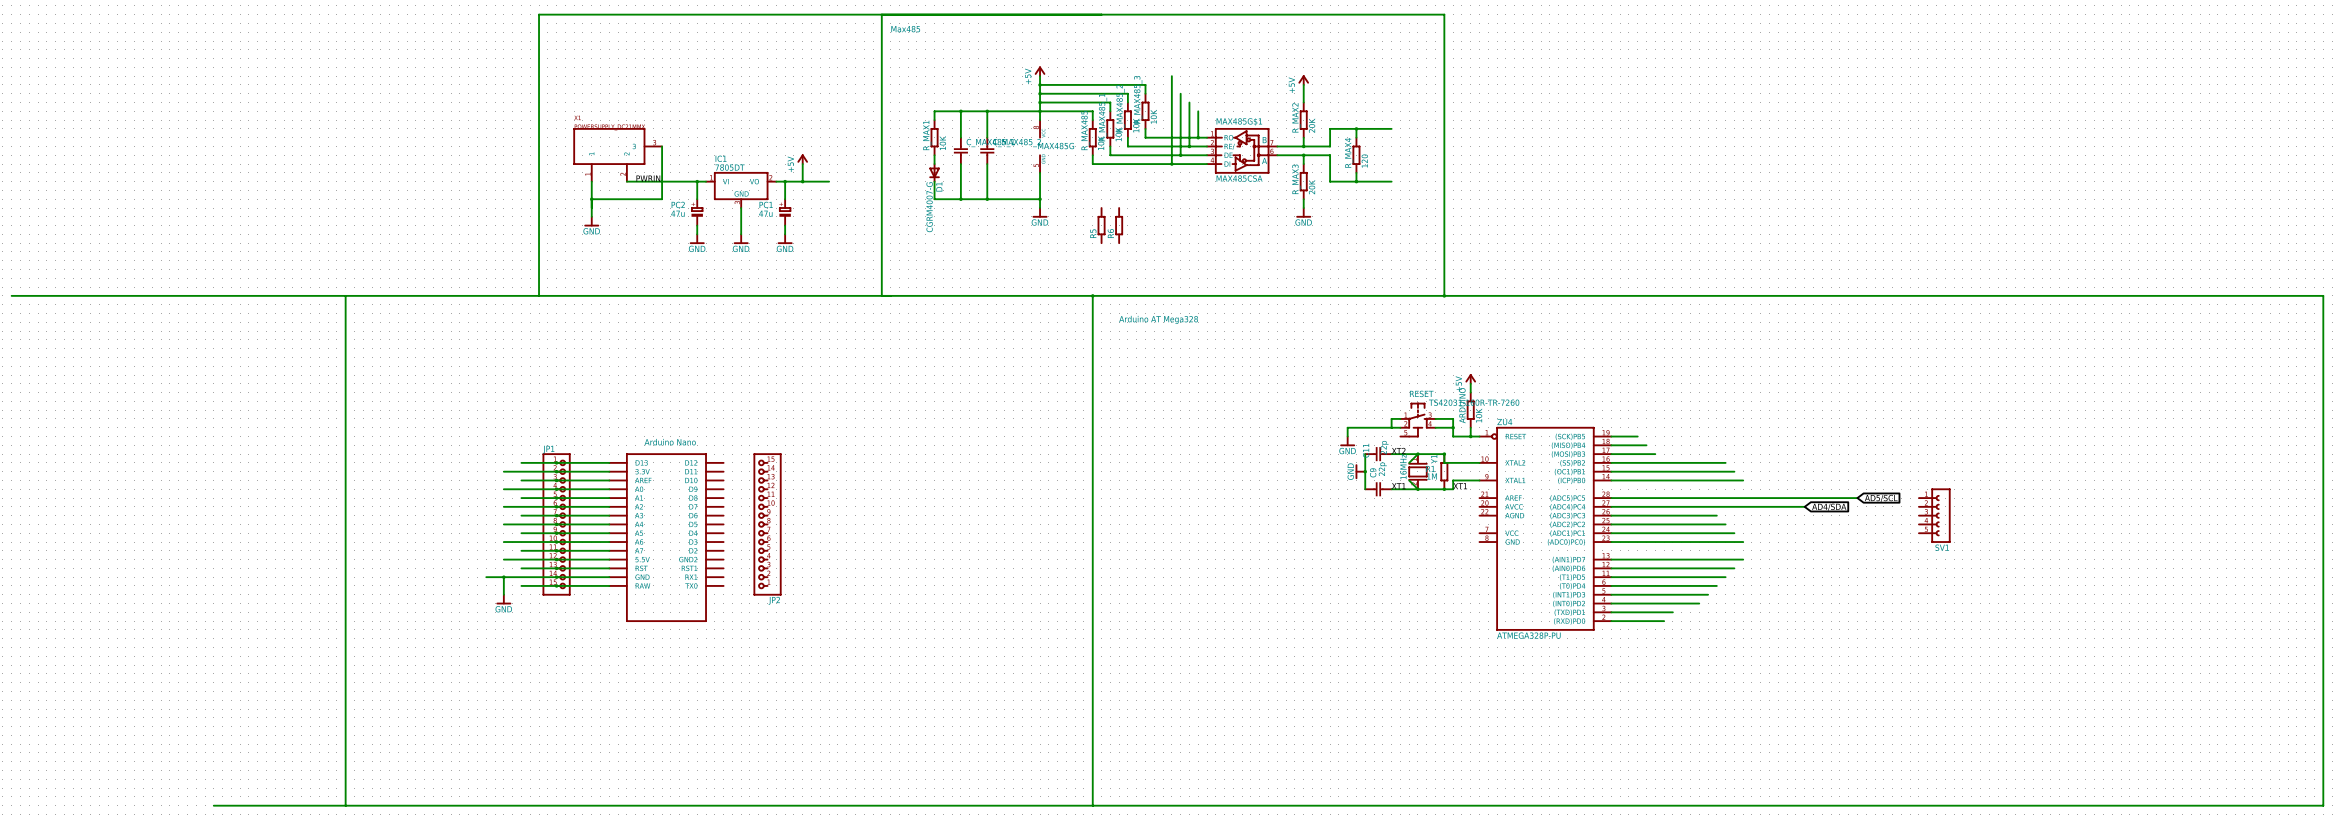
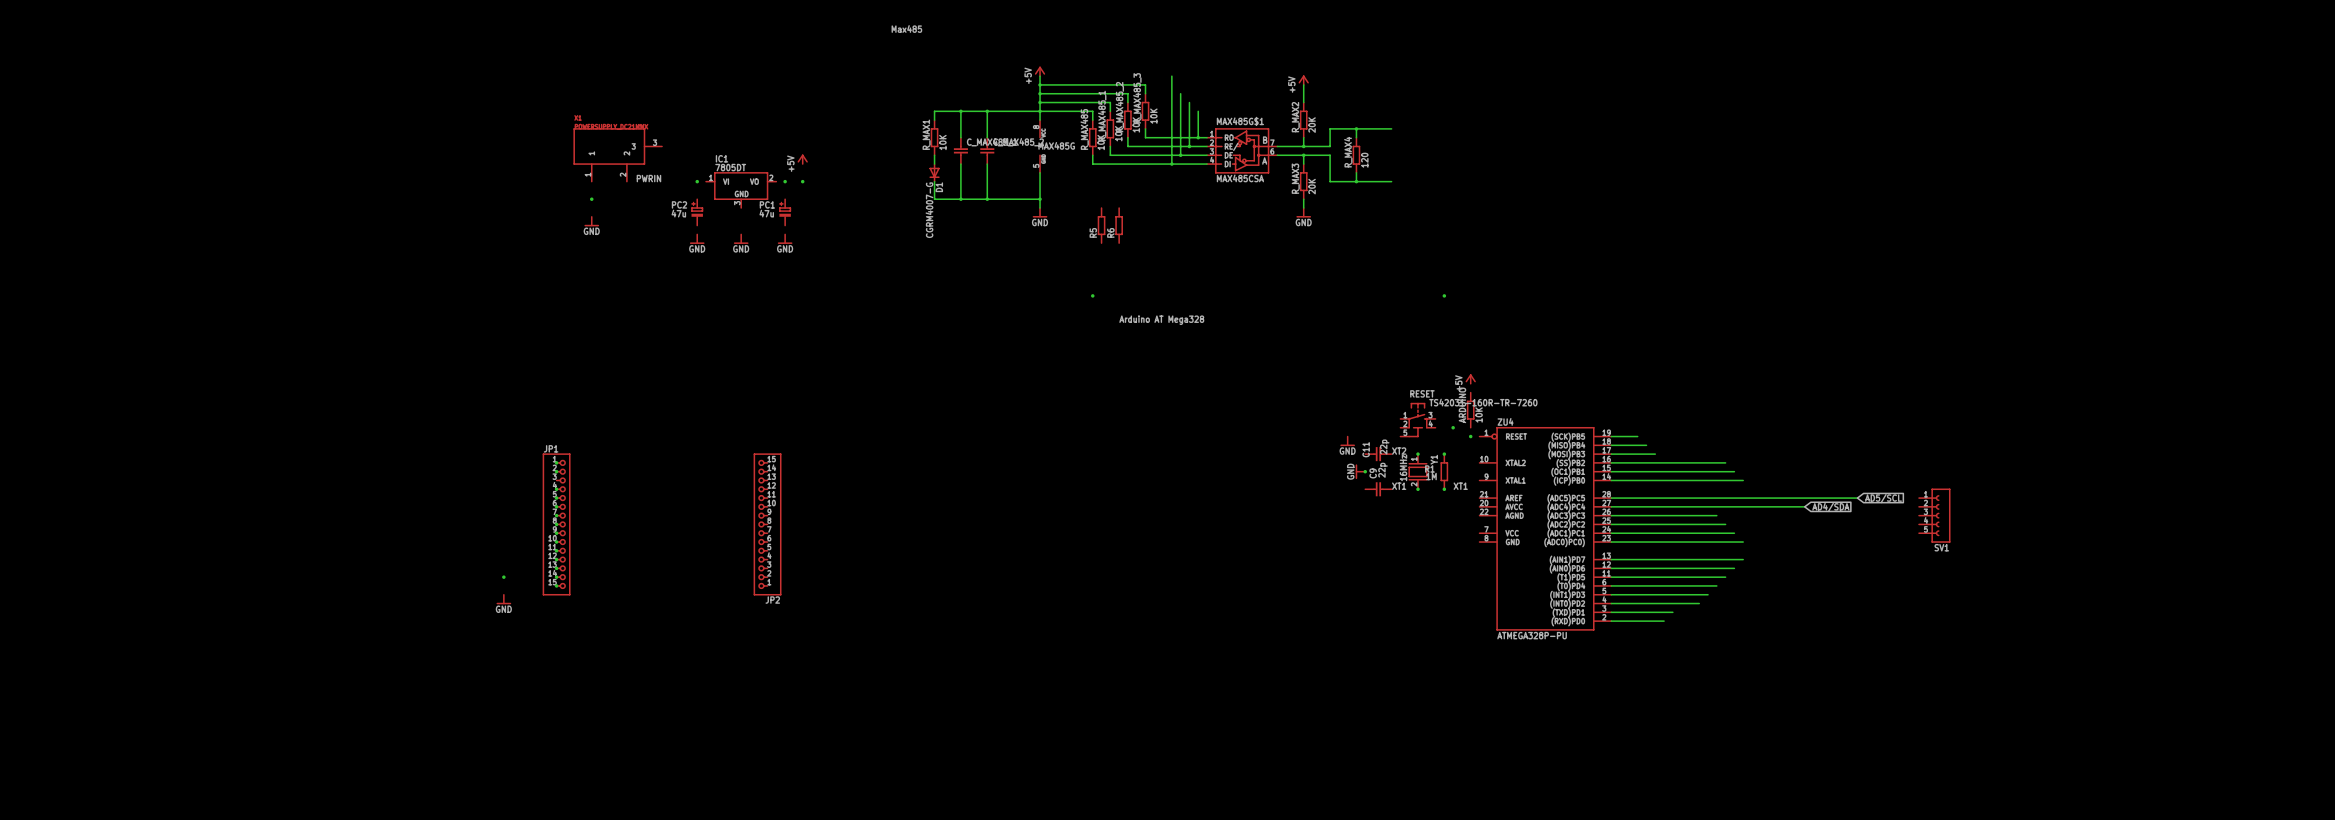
wire: (881, 14) (881, 295) -> none
wire: (662, 146) (662, 199) (591, 199) -> none
wire: (802, 164) (802, 181) -> none
wire: (591, 181) (591, 216) -> none
wire: (626, 181) (706, 181) -> none
wire: (697, 181) (697, 199) -> none
wire: (776, 181) (829, 181) -> none
wire: (785, 181) (785, 199) -> none
wire: (741, 208) (741, 234) -> none
wire: (697, 225) (697, 234) -> none
wire: (785, 225) (785, 234) -> none
wire: (11, 295) (2323, 295) (2323, 805) (213, 805) -> none
wire: (345, 295) (345, 805) -> none
wire: (539, 295) (539, 14) (1444, 14) (1444, 295) -> none
wire: (1092, 295) (1092, 805) -> none
wire: (1470, 383) (1470, 392) -> none
wire: (1400, 418) (1391, 418) (1391, 427) -> none
wire: (1435, 418) (1453, 418) (1453, 436) (1479, 436) -> none
wire: (1400, 427) (1347, 427) (1347, 436) -> none
wire: (1435, 427) (1453, 427) -> none
wire: (1470, 427) (1470, 436) -> none
wire: (1365, 454) (1365, 489) -> none
wire: (1391, 454) (1444, 454) (1444, 462) (1479, 462) -> none
wire: (1417, 454) (1409, 462) -> none
wire: (521, 462) (609, 462) -> none
wire: (503, 471) (609, 471) -> none
wire: (521, 480) (609, 480) -> none
junction: (556, 480) -> none
wire: (1409, 480) (1417, 489) -> none
wire: (1479, 480) (1453, 480) (1453, 489) (1391, 489) -> none
wire: (503, 489) (609, 489) -> none
wire: (521, 498) (609, 498) -> none
wire: (503, 506) (609, 506) -> none
wire: (521, 515) (609, 515) -> none
wire: (503, 524) (609, 524) -> none
wire: (521, 533) (609, 533) -> none
part: (666, 537) -> none
wire: (503, 542) (609, 542) -> none
wire: (521, 550) (609, 550) -> none
wire: (503, 559) (609, 559) -> none
wire: (521, 568) (609, 568) -> none
wire: (486, 577) (609, 577) -> none
wire: (503, 577) (503, 594) -> none
wire: (521, 585) (609, 585) -> none

